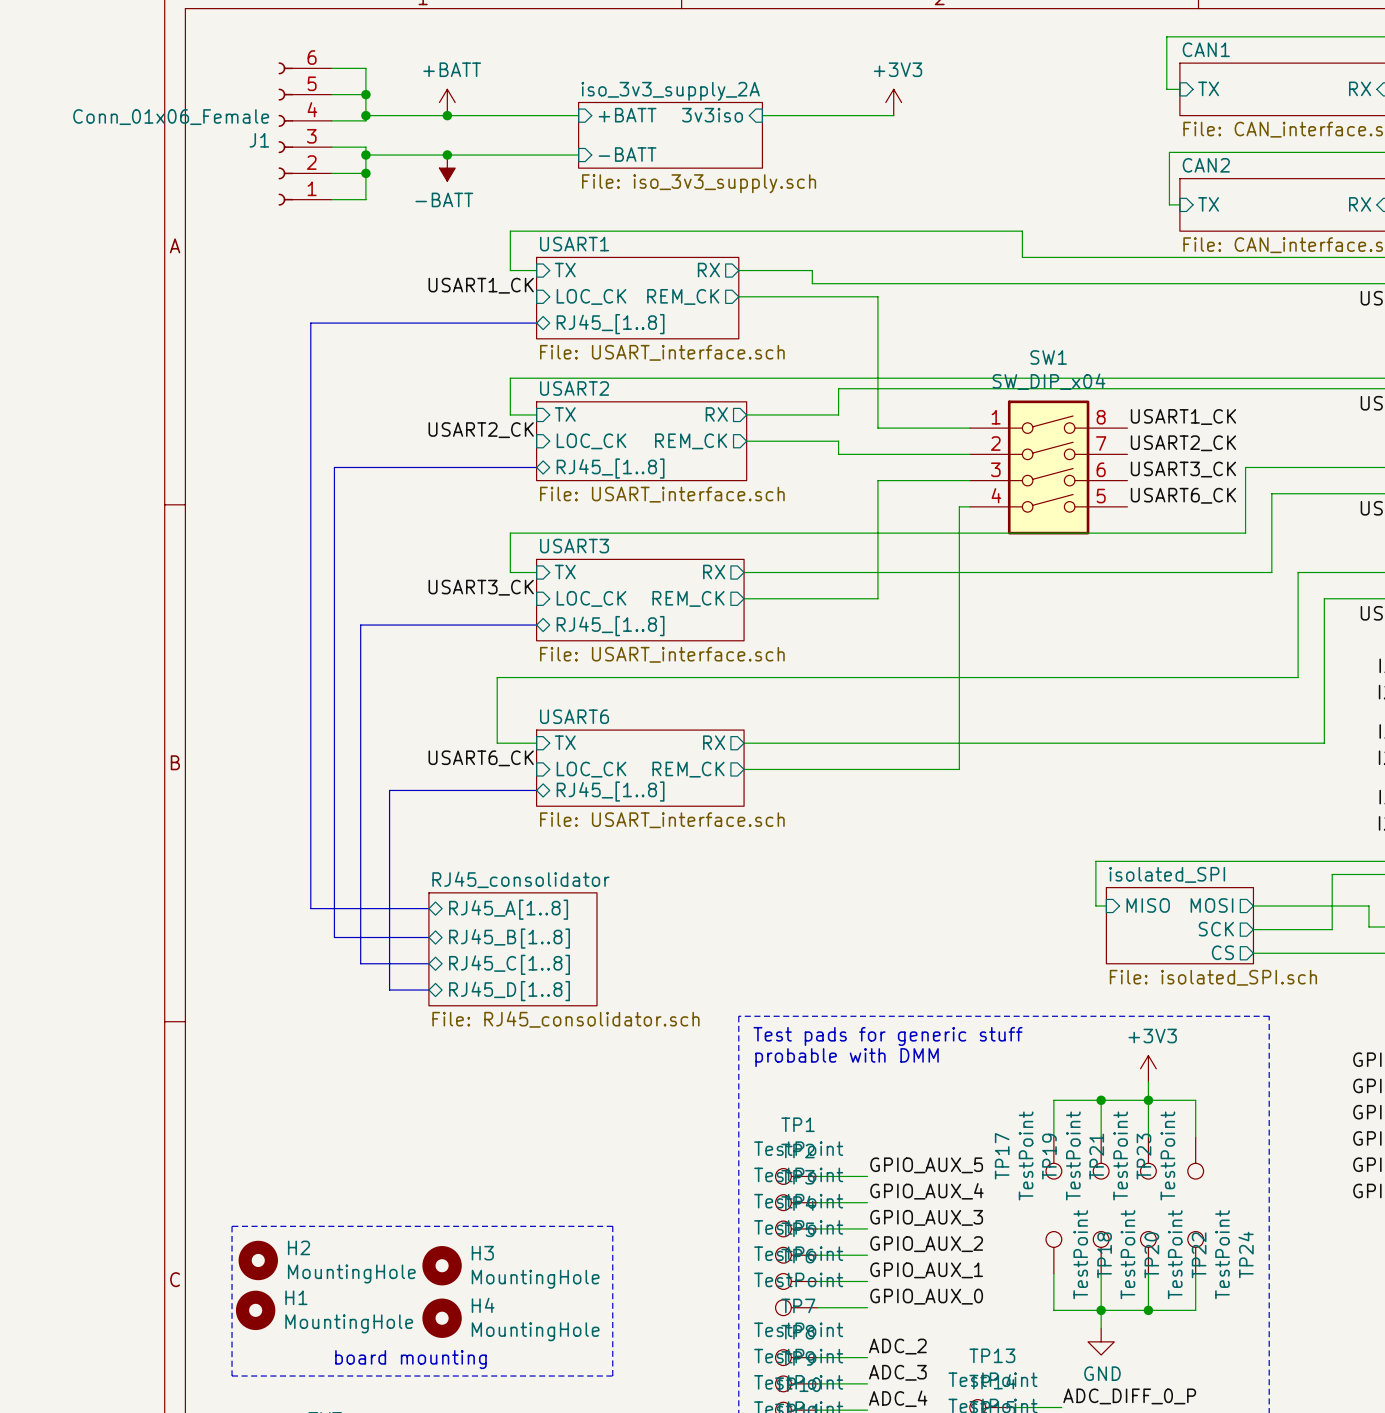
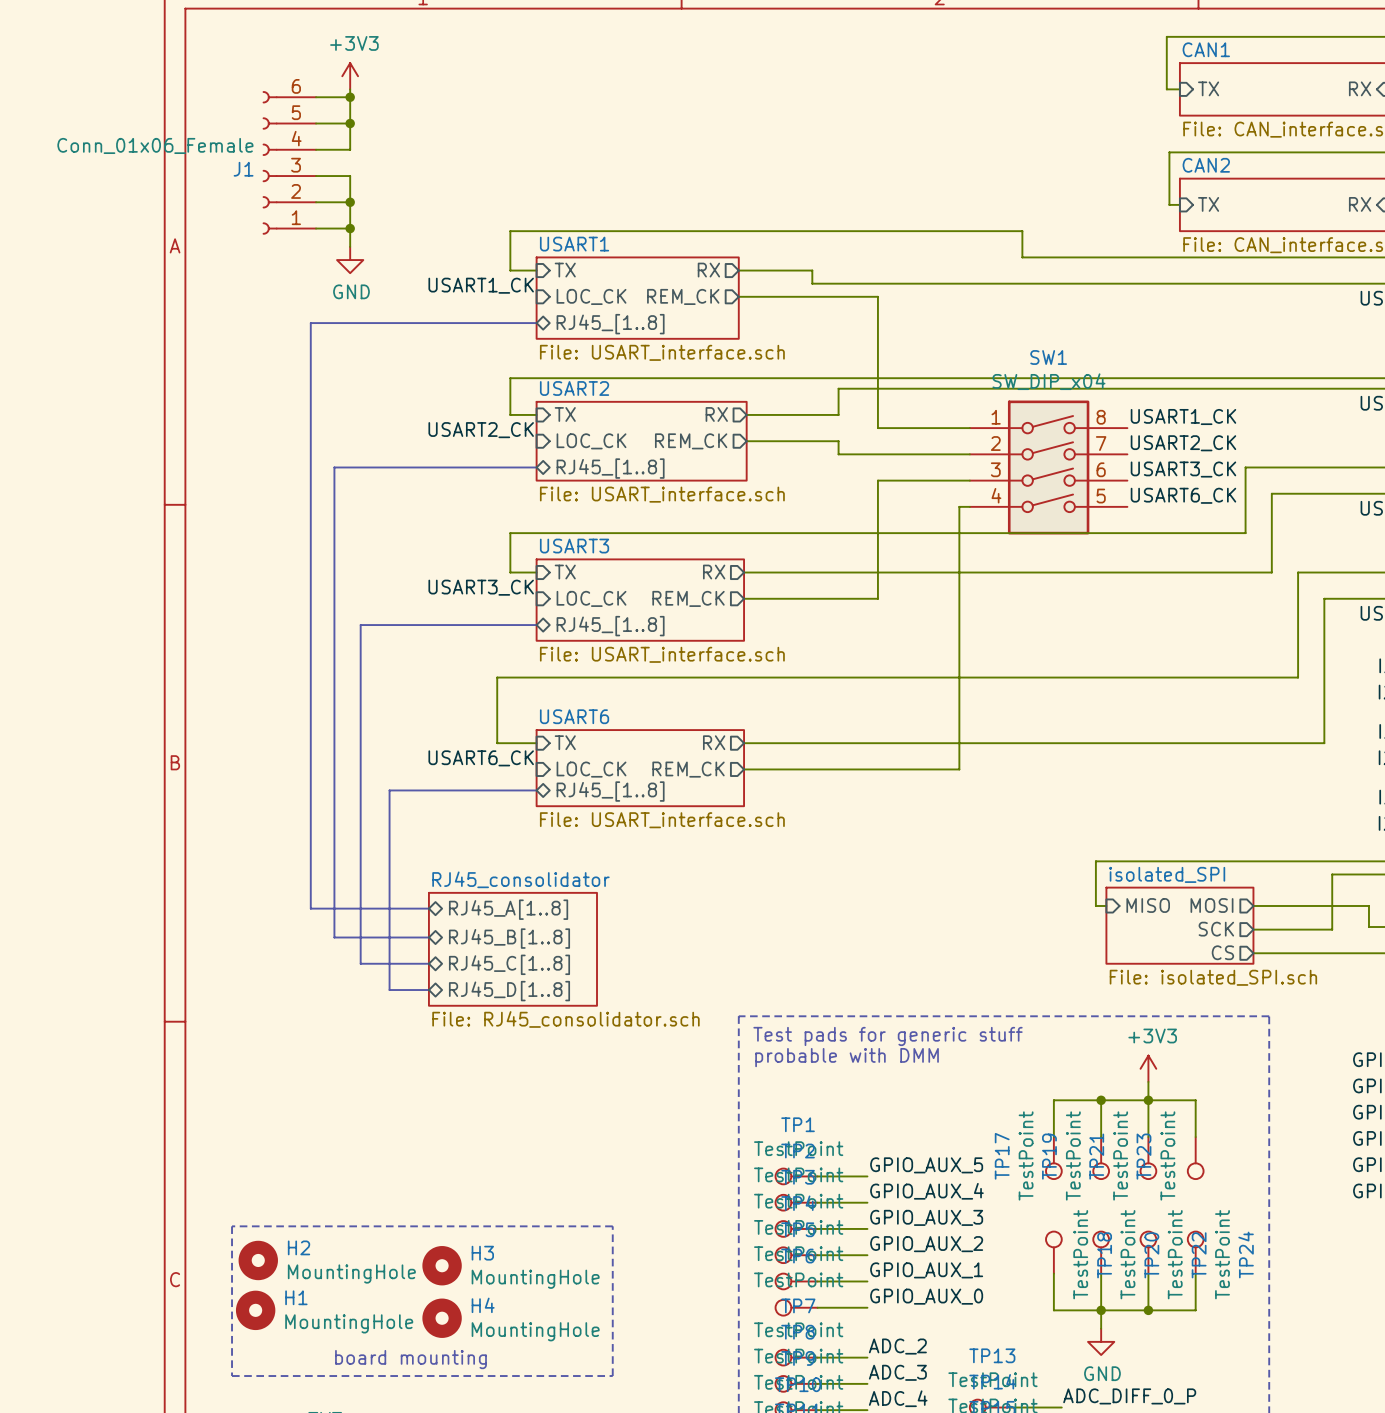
wire: (331, 68) (365, 68) (365, 120) (331, 120) -> none
power symbol: none -> +3V3 (350, 76)
wire: none -> (350, 89) (350, 149) (316, 149)
wire: (331, 94) (365, 94) -> (316, 123) (350, 123)
junction: (365, 94) -> none
wire: none -> (316, 97) (350, 97)
junction: none -> (350, 97)
power symbol: +BATT (447, 102) -> none
power symbol: +3V3 (893, 102) -> none
wire: (365, 115) (578, 115) -> none
junction: (365, 115) -> none
junction: (447, 115) -> none
sheet pin: +BATT (627, 115) -> none
sheet pin: 3v3iso (712, 115) -> none
wire: (762, 115) (893, 115) -> none
junction: none -> (350, 123)
J1 position: (305, 134) -> (289, 162)
sheet iso_3v3_supply_2A: File: iso_3v3_supply.sch (670, 135) -> none
wire: (331, 147) (365, 147) (365, 199) (331, 199) -> none
sheet pin: -BATT (627, 154) -> none
wire: (365, 155) (578, 155) -> none
junction: (365, 155) -> none
junction: (447, 155) -> none
power symbol: -BATT (447, 168) -> none
wire: (331, 173) (365, 173) -> (316, 202) (350, 202)
junction: (365, 173) -> none
wire: none -> (316, 176) (350, 176) (350, 246)
junction: none -> (350, 202)
wire: none -> (316, 228) (350, 228)
junction: none -> (350, 228)
power symbol: none -> GND (350, 260)

